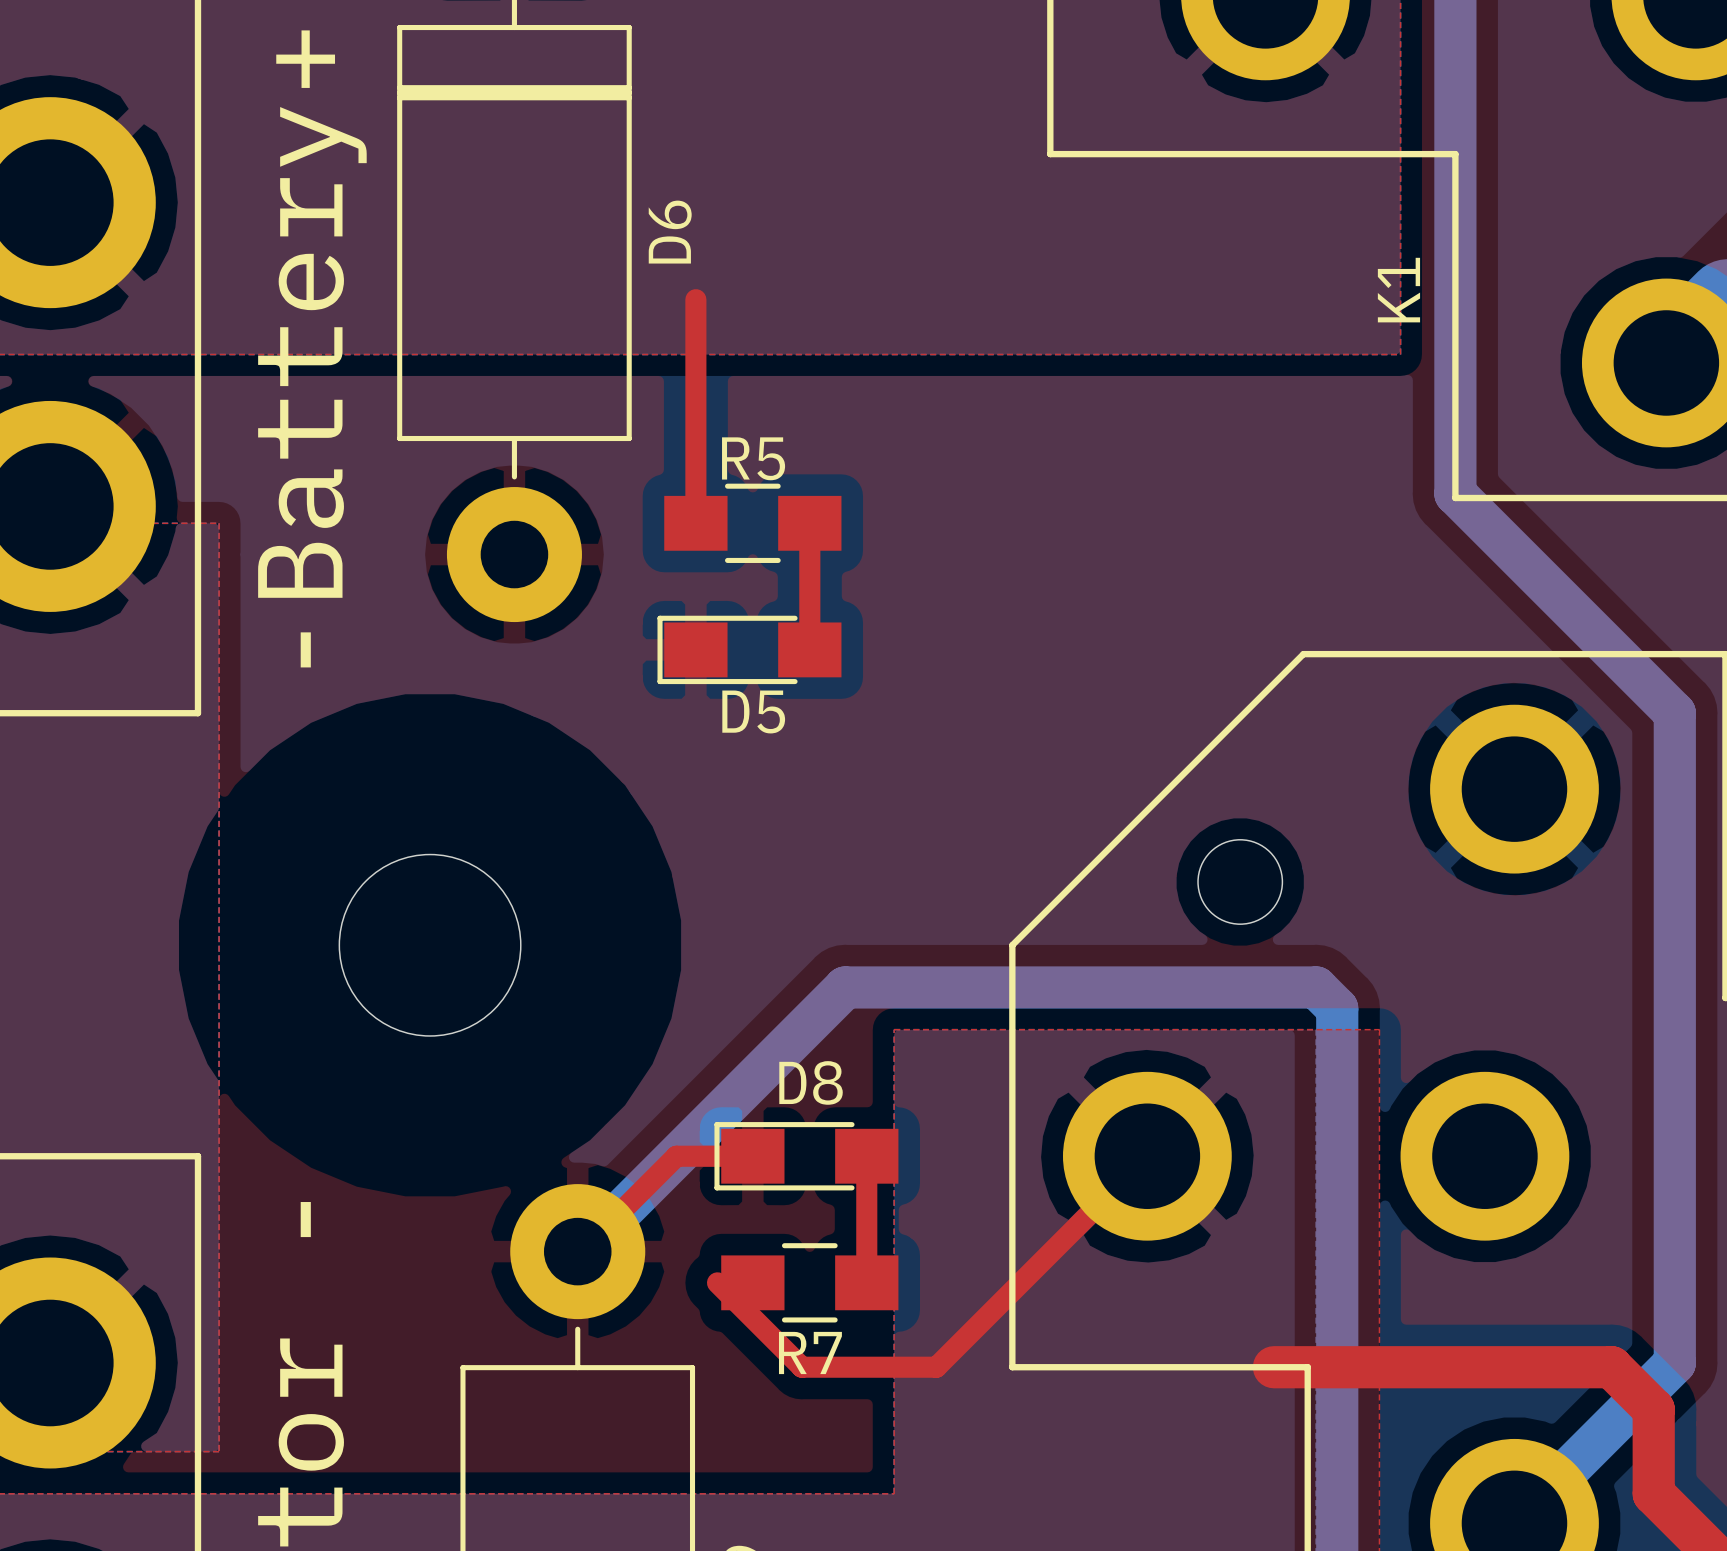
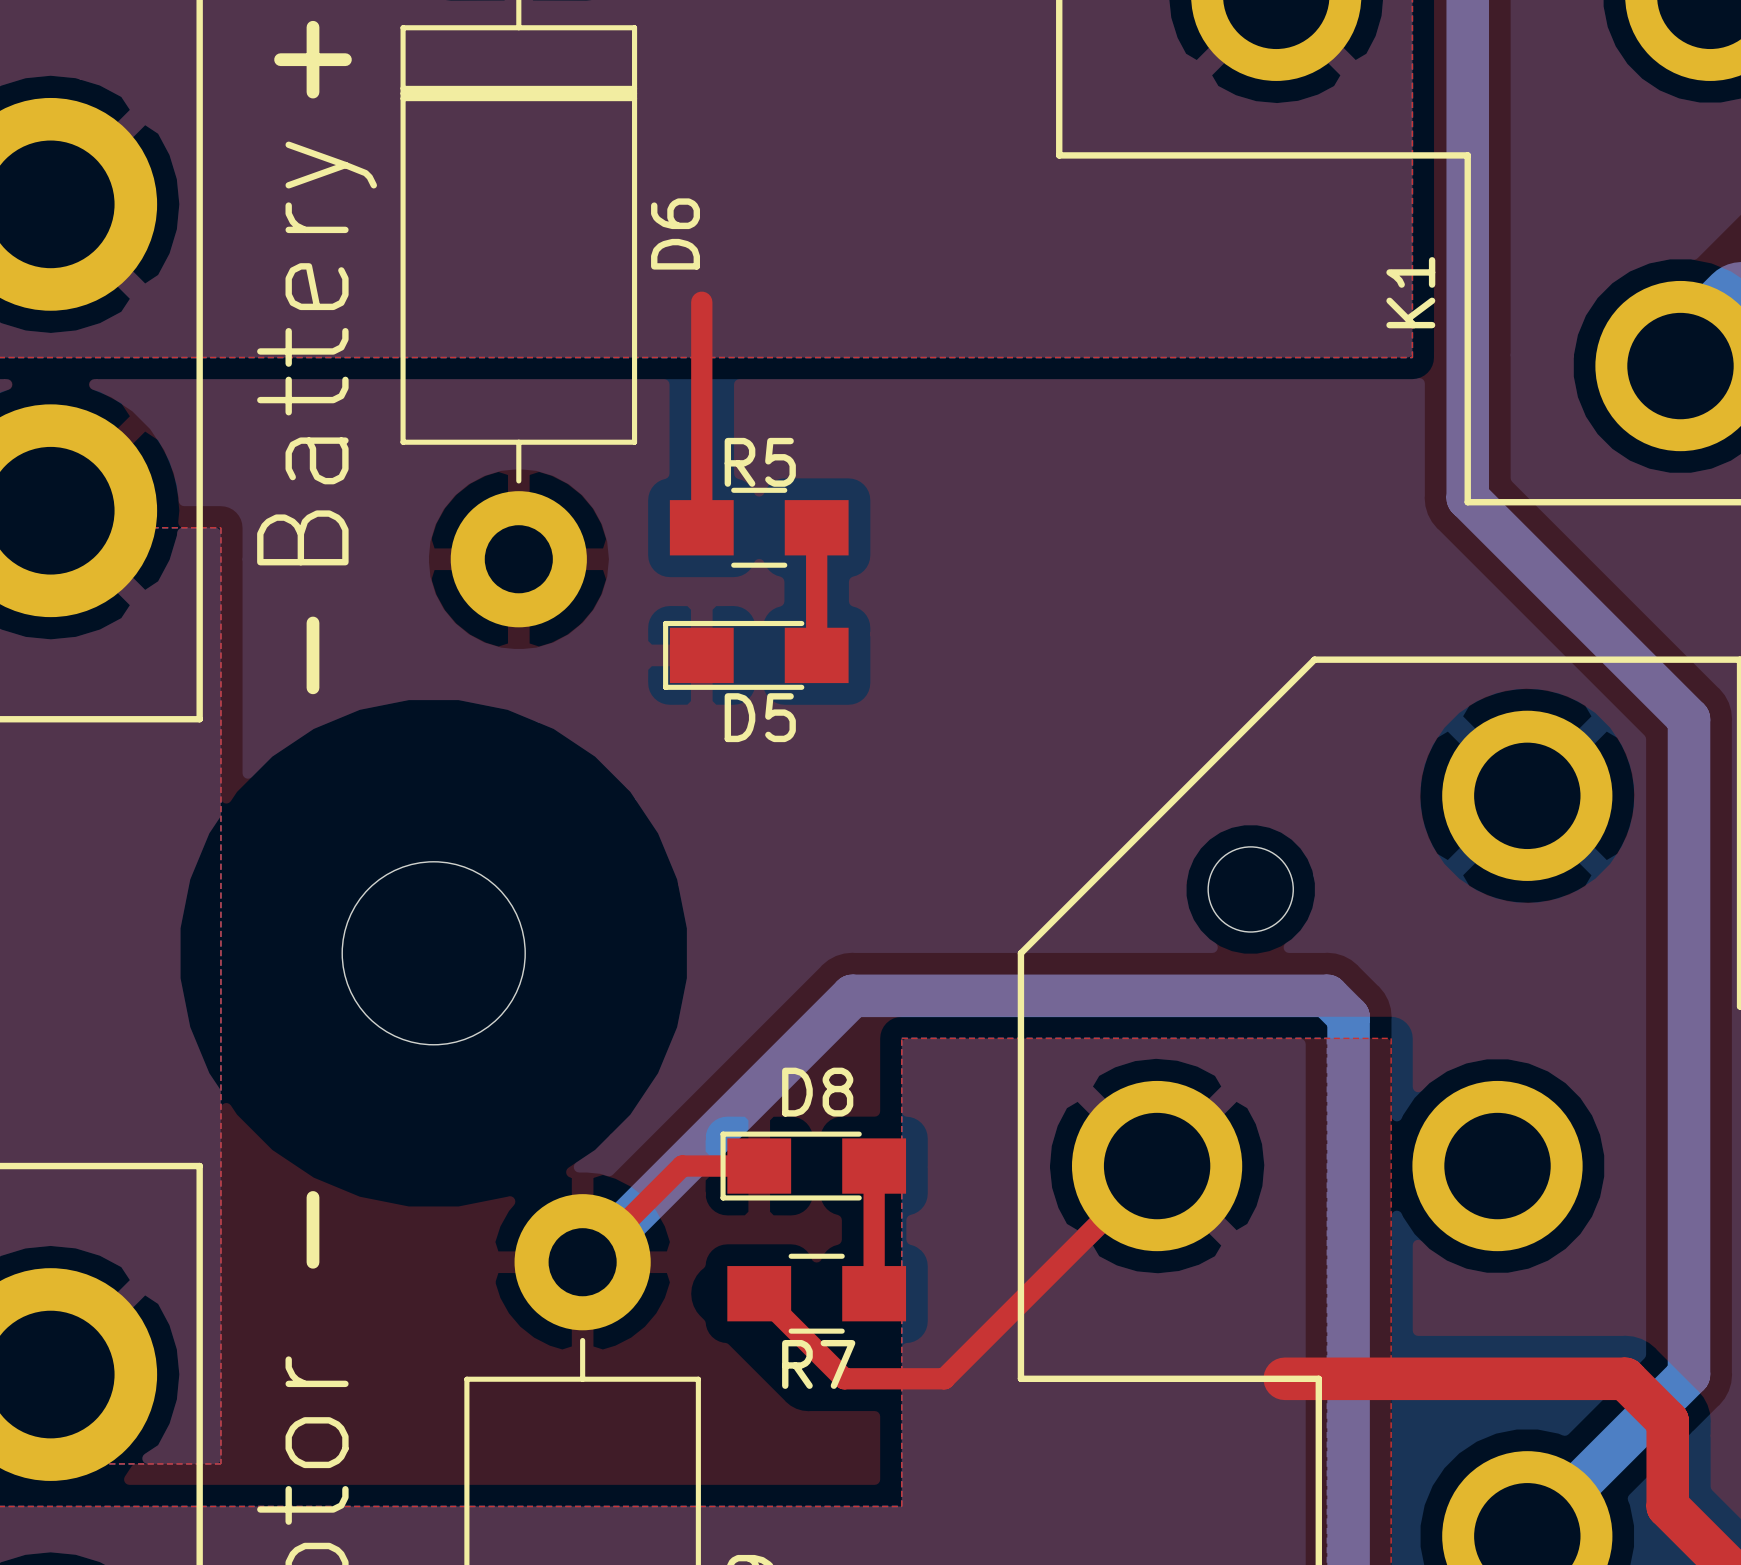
top track: (717, 1282) (801, 1367) (837, 1367) -> (759, 1293) (844, 1378)

